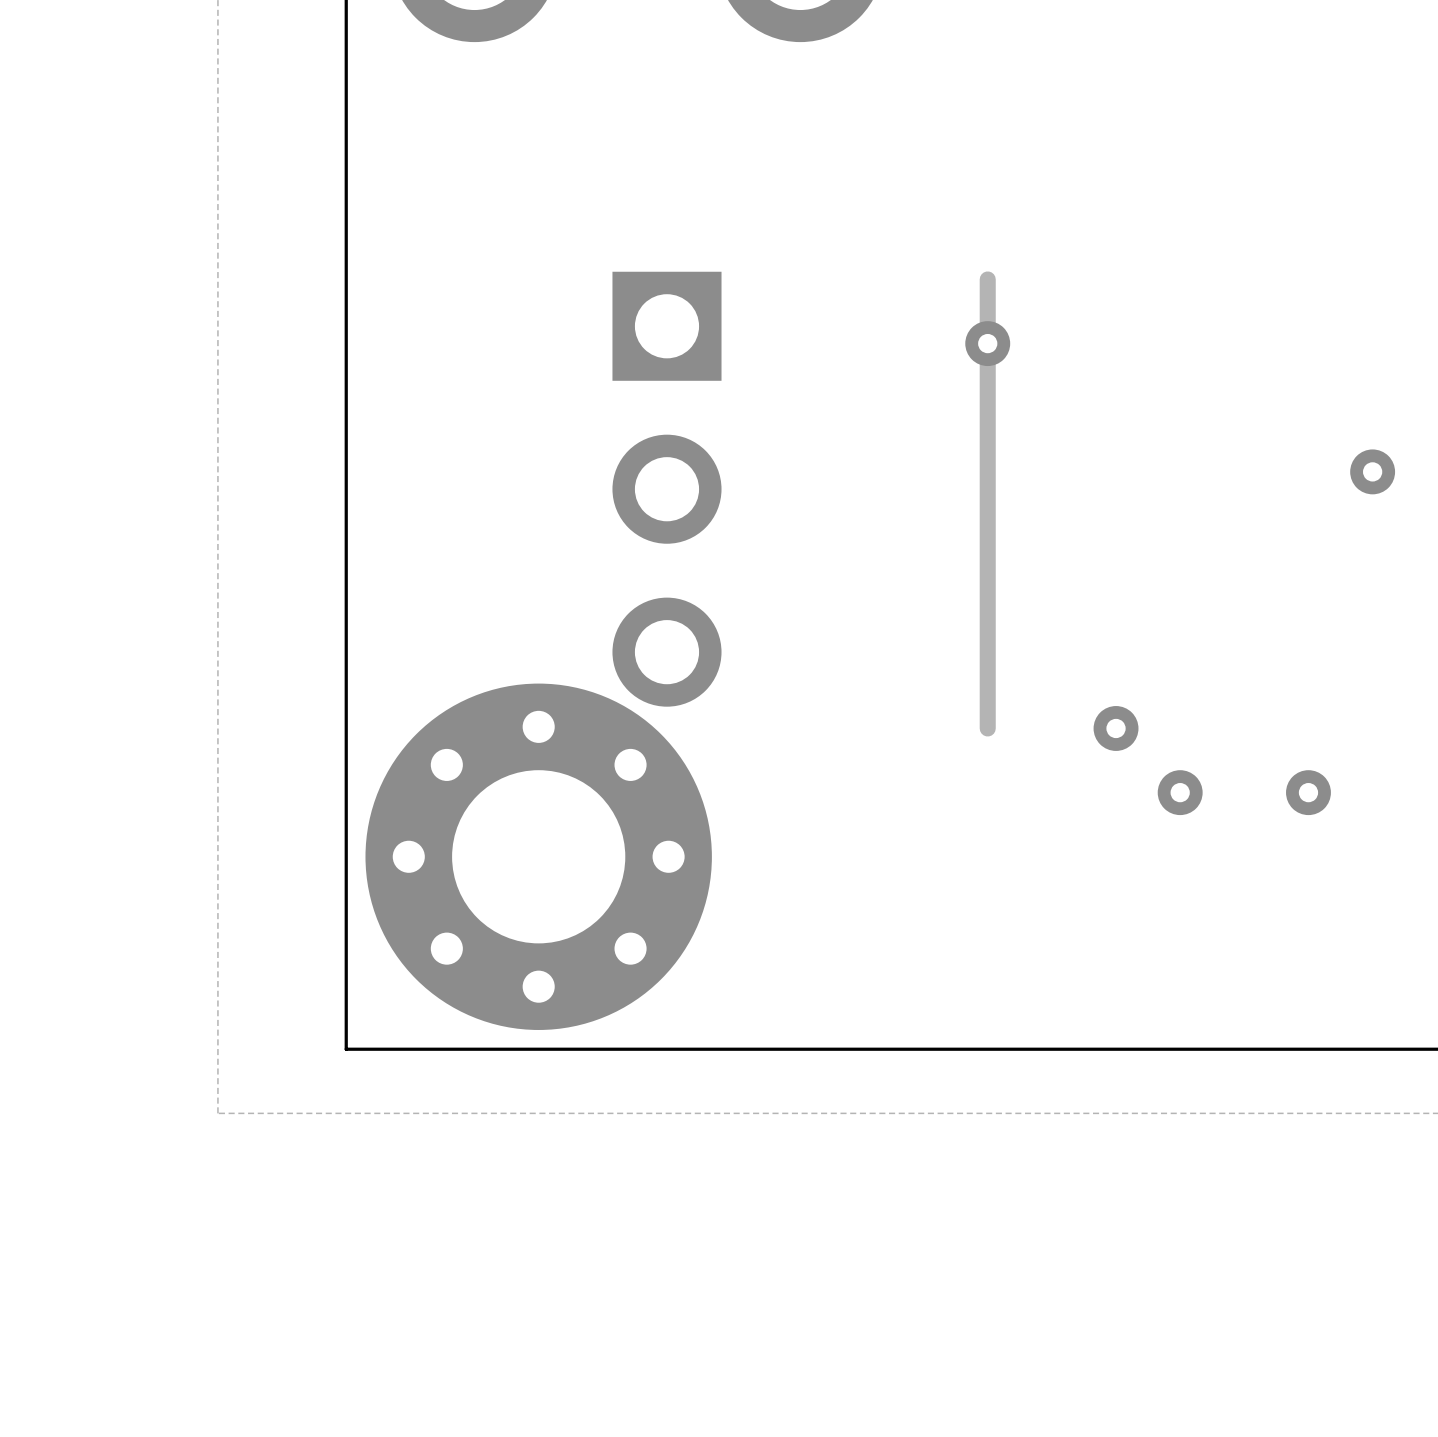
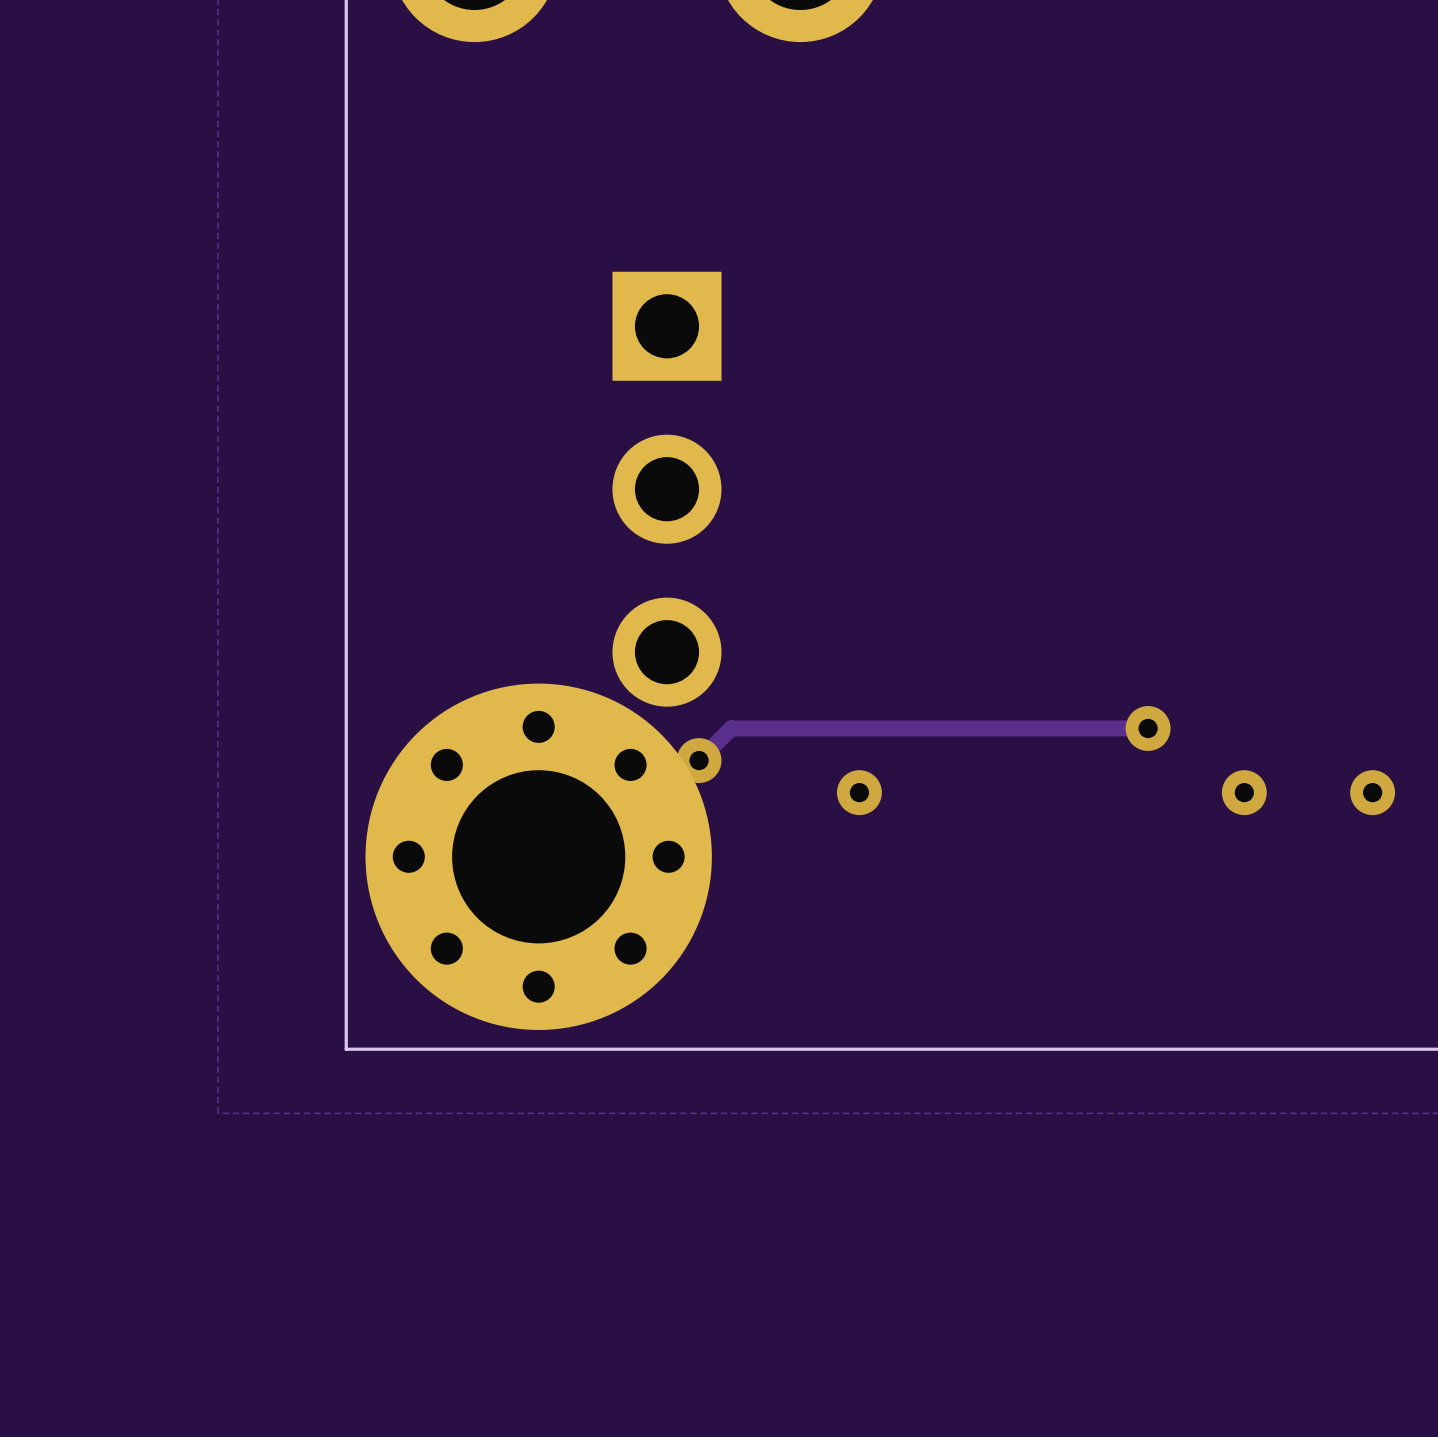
track: (987, 279) (987, 728) -> none
via: (987, 343) -> none
via: (1372, 471) -> none
via position: (1116, 728) -> (1148, 728)
track: none -> (1148, 728) (731, 728) (699, 760)
via: none -> (699, 760)
via: none -> (859, 792)
via: (1180, 792) -> none
via: none -> (1244, 792)
via: (1308, 792) -> none
via: none -> (1372, 792)

